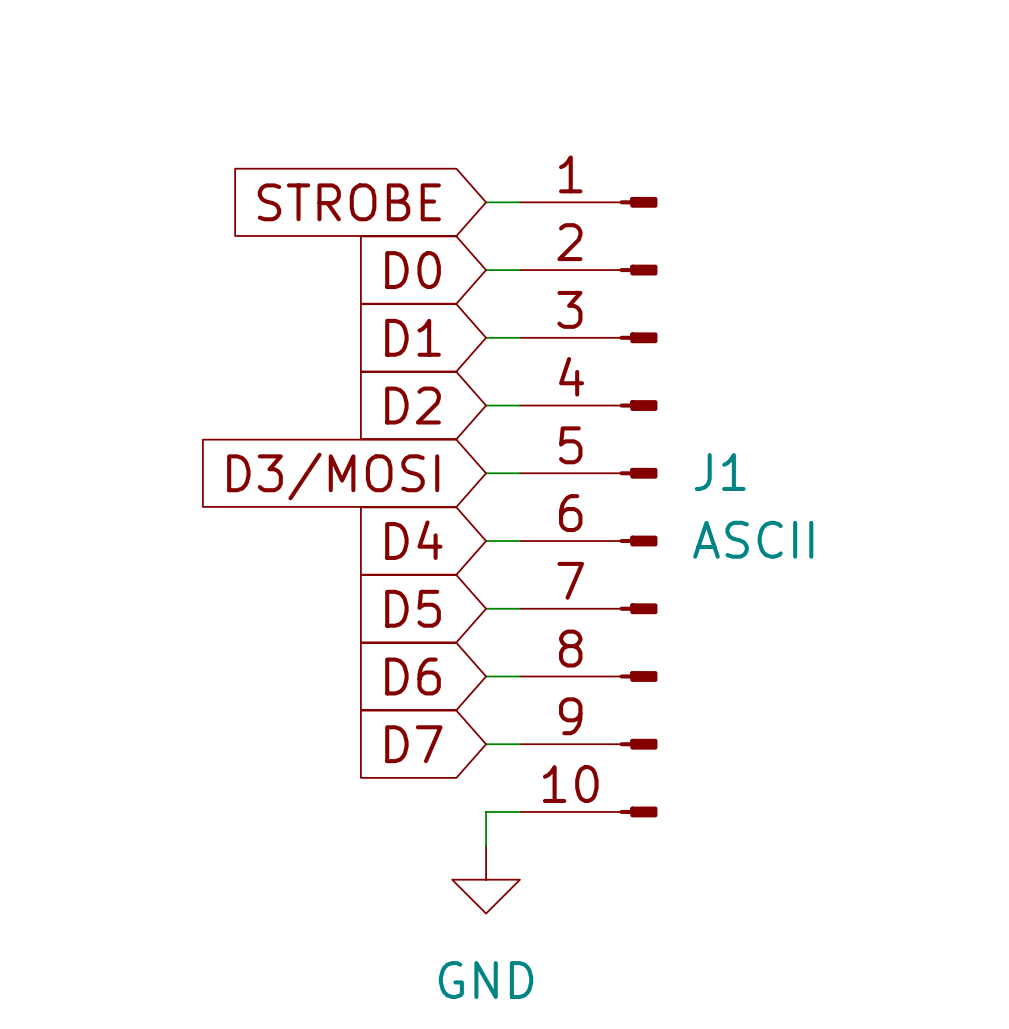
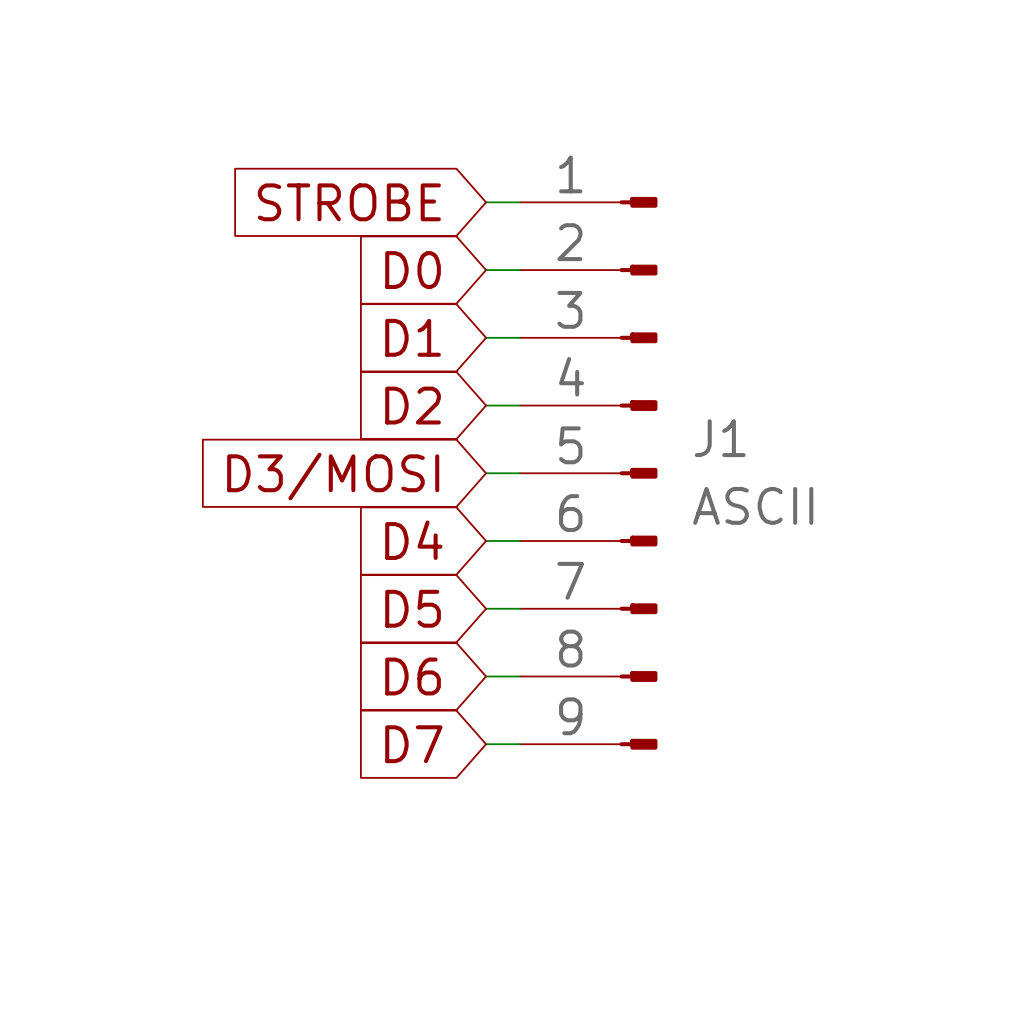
J1 symbol: [519, 196, 658, 818] -> [519, 196, 658, 750]
wire: (519, 811) (486, 811) (486, 845) -> none
power symbol: GND (486, 879) -> none

